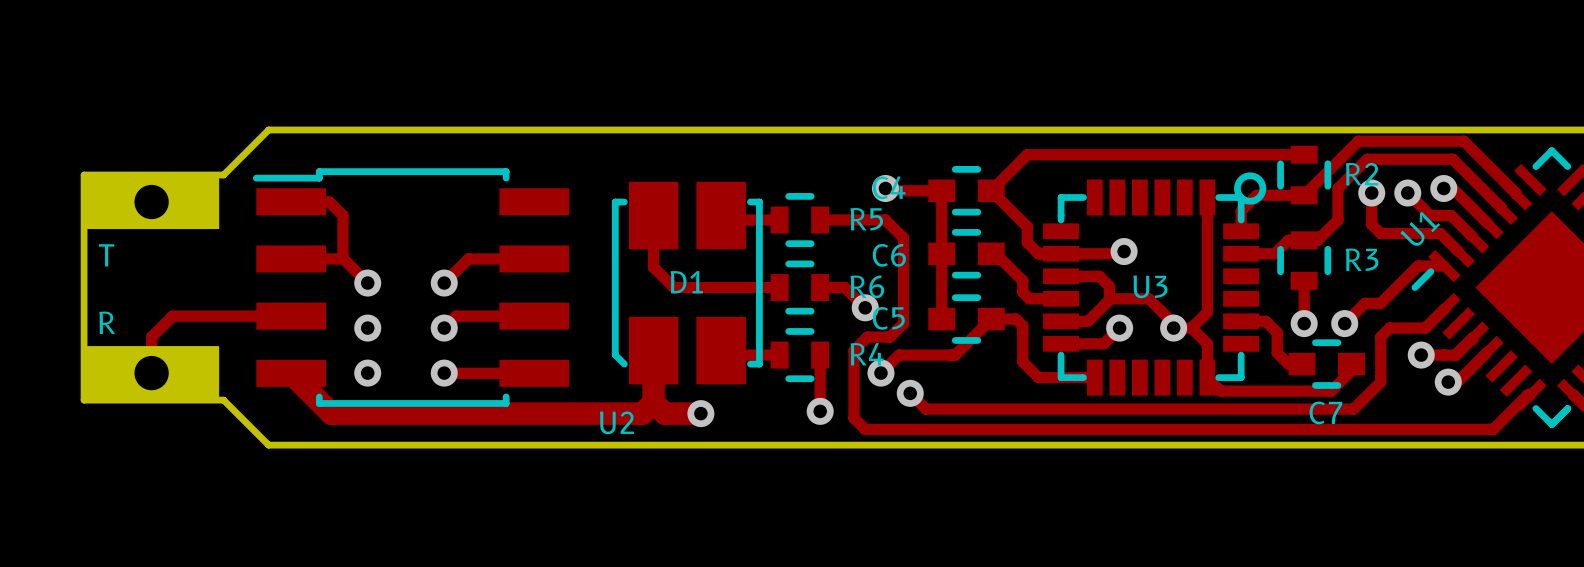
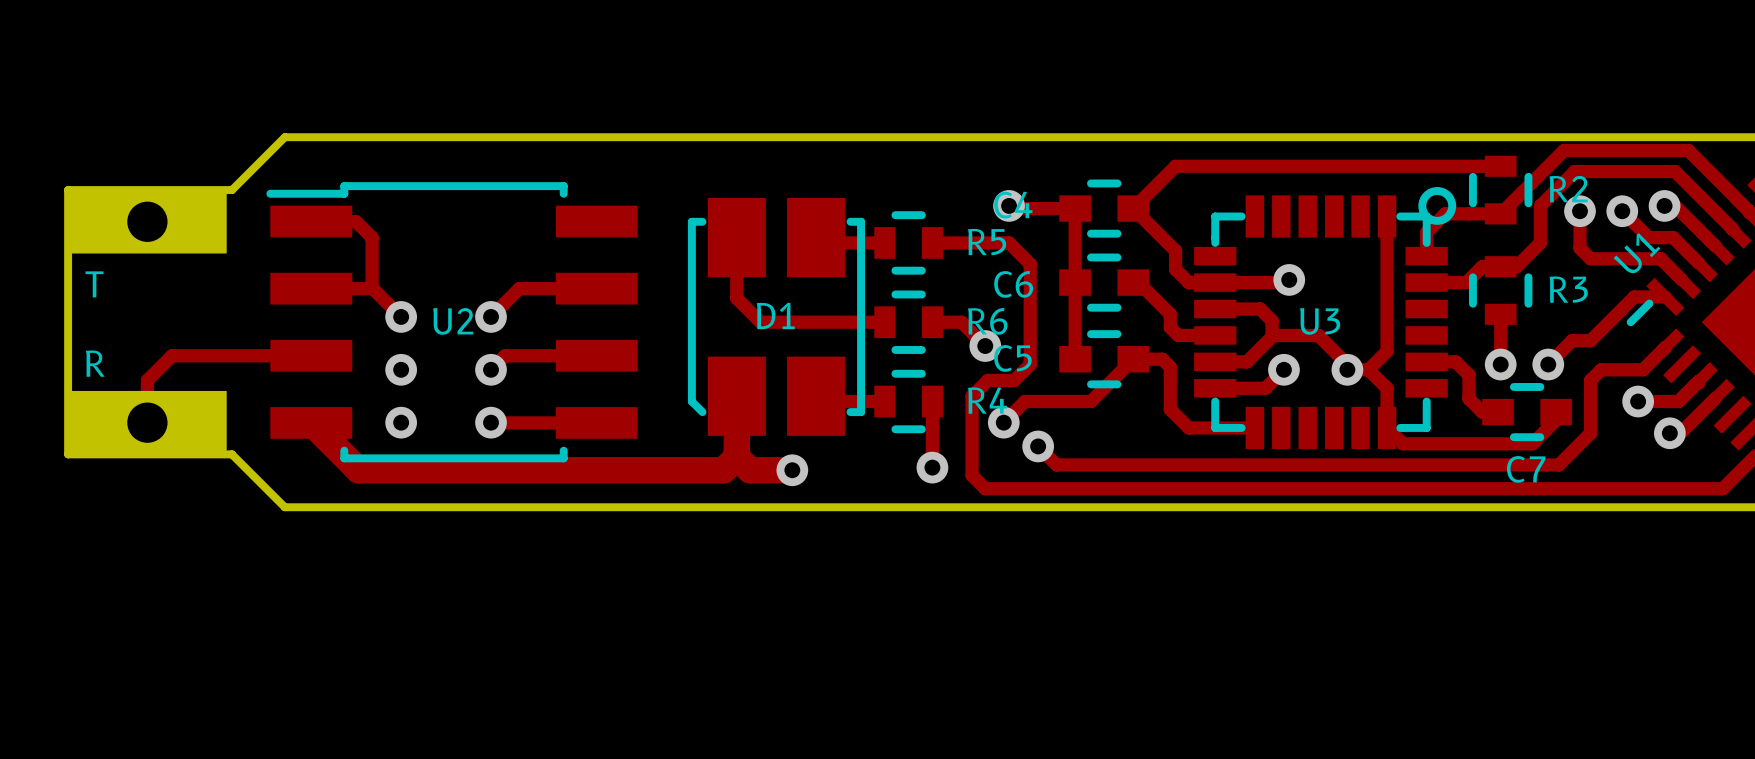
U2 name position: U2 (616, 422) -> U2 (453, 321)

